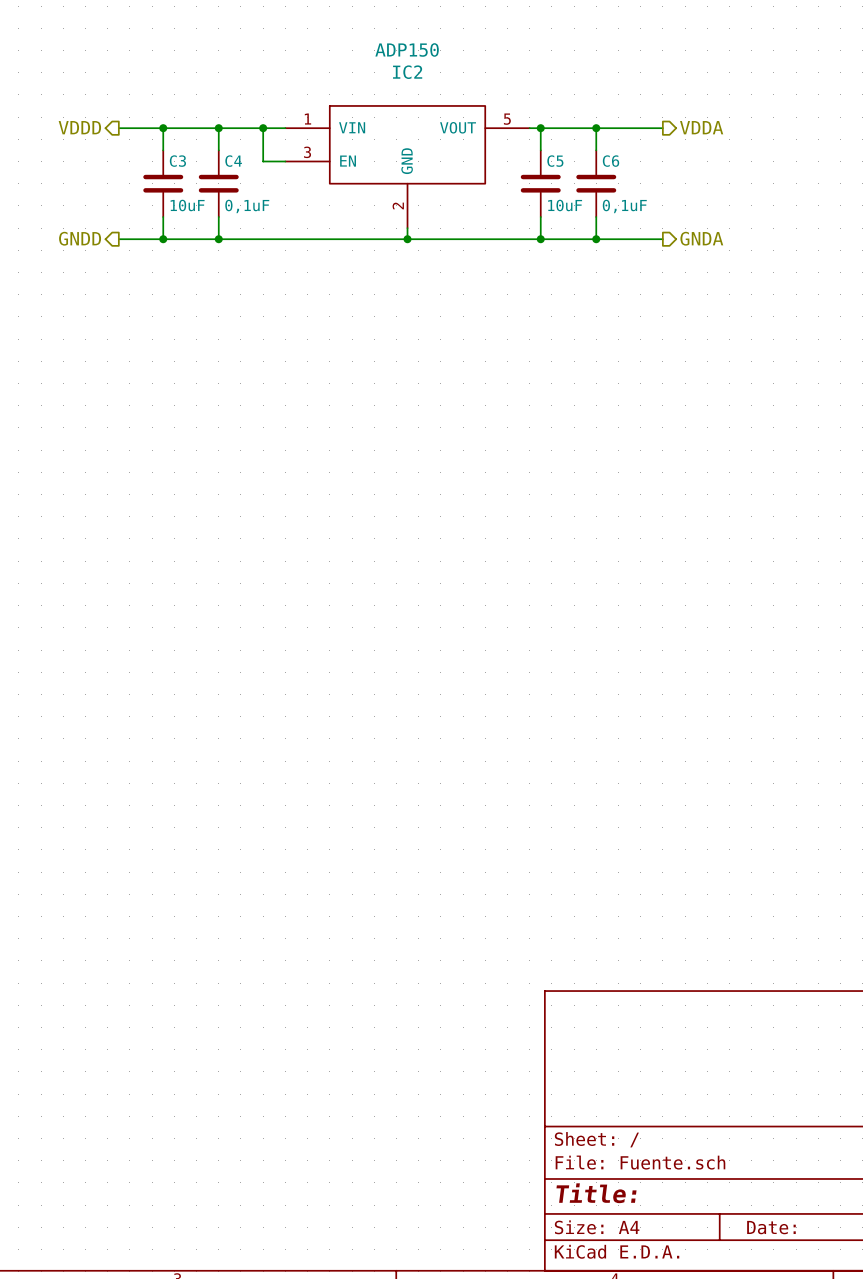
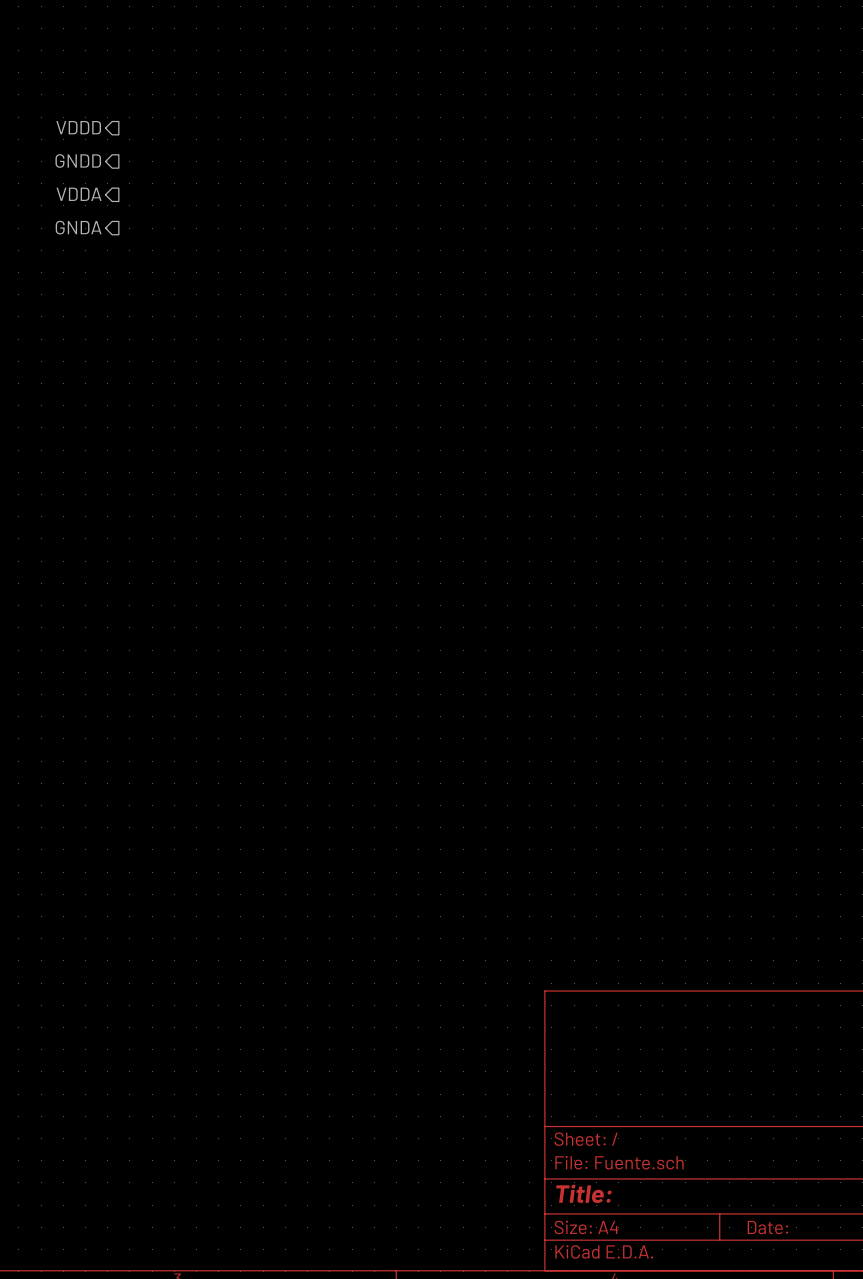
hierarchical label: VDDA (701, 127) -> none
wire: (118, 128) (285, 128) -> none
wire: (163, 128) (163, 150) -> none
junction: (163, 128) -> none
wire: (218, 128) (218, 150) -> none
junction: (218, 128) -> none
wire: (263, 128) (263, 161) (285, 161) -> none
junction: (263, 128) -> none
wire: (529, 128) (662, 128) -> none
wire: (540, 128) (540, 150) -> none
junction: (540, 128) -> none
wire: (596, 128) (596, 150) -> none
junction: (596, 128) -> none
IC2: ADP150 (407, 167) -> none
C3: 10uF (163, 183) -> none
C4: 0,1uF (218, 183) -> none
C5: 10uF (540, 183) -> none
C6: 0,1uF (596, 183) -> none
hierarchical label: none -> VDDA (79, 194)
wire: (163, 217) (163, 239) -> none
wire: (218, 217) (218, 239) -> none
wire: (540, 217) (540, 239) -> none
wire: (596, 217) (596, 239) -> none
hierarchical label: none -> GNDA (78, 227)
wire: (407, 228) (407, 239) -> none
hierarchical label position: GNDD (80, 238) -> GNDD (78, 160)
hierarchical label: GNDA (701, 238) -> none
wire: (118, 239) (662, 239) -> none
junction: (163, 239) -> none
junction: (218, 239) -> none
junction: (407, 239) -> none
junction: (540, 239) -> none
junction: (596, 239) -> none

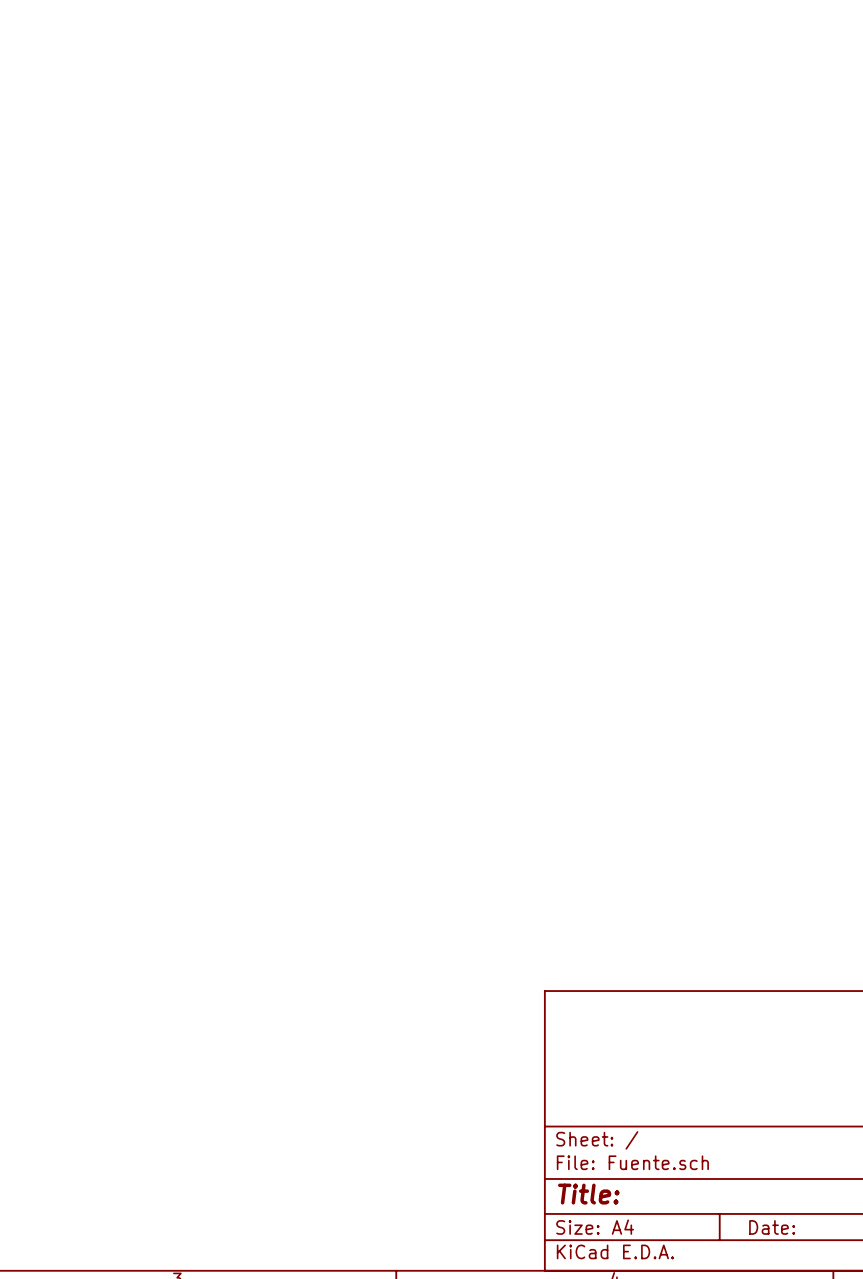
hierarchical label: VDDD (78, 127) -> none
hierarchical label: GNDD (78, 160) -> none
hierarchical label: VDDA (79, 194) -> none
hierarchical label: GNDA (78, 227) -> none

